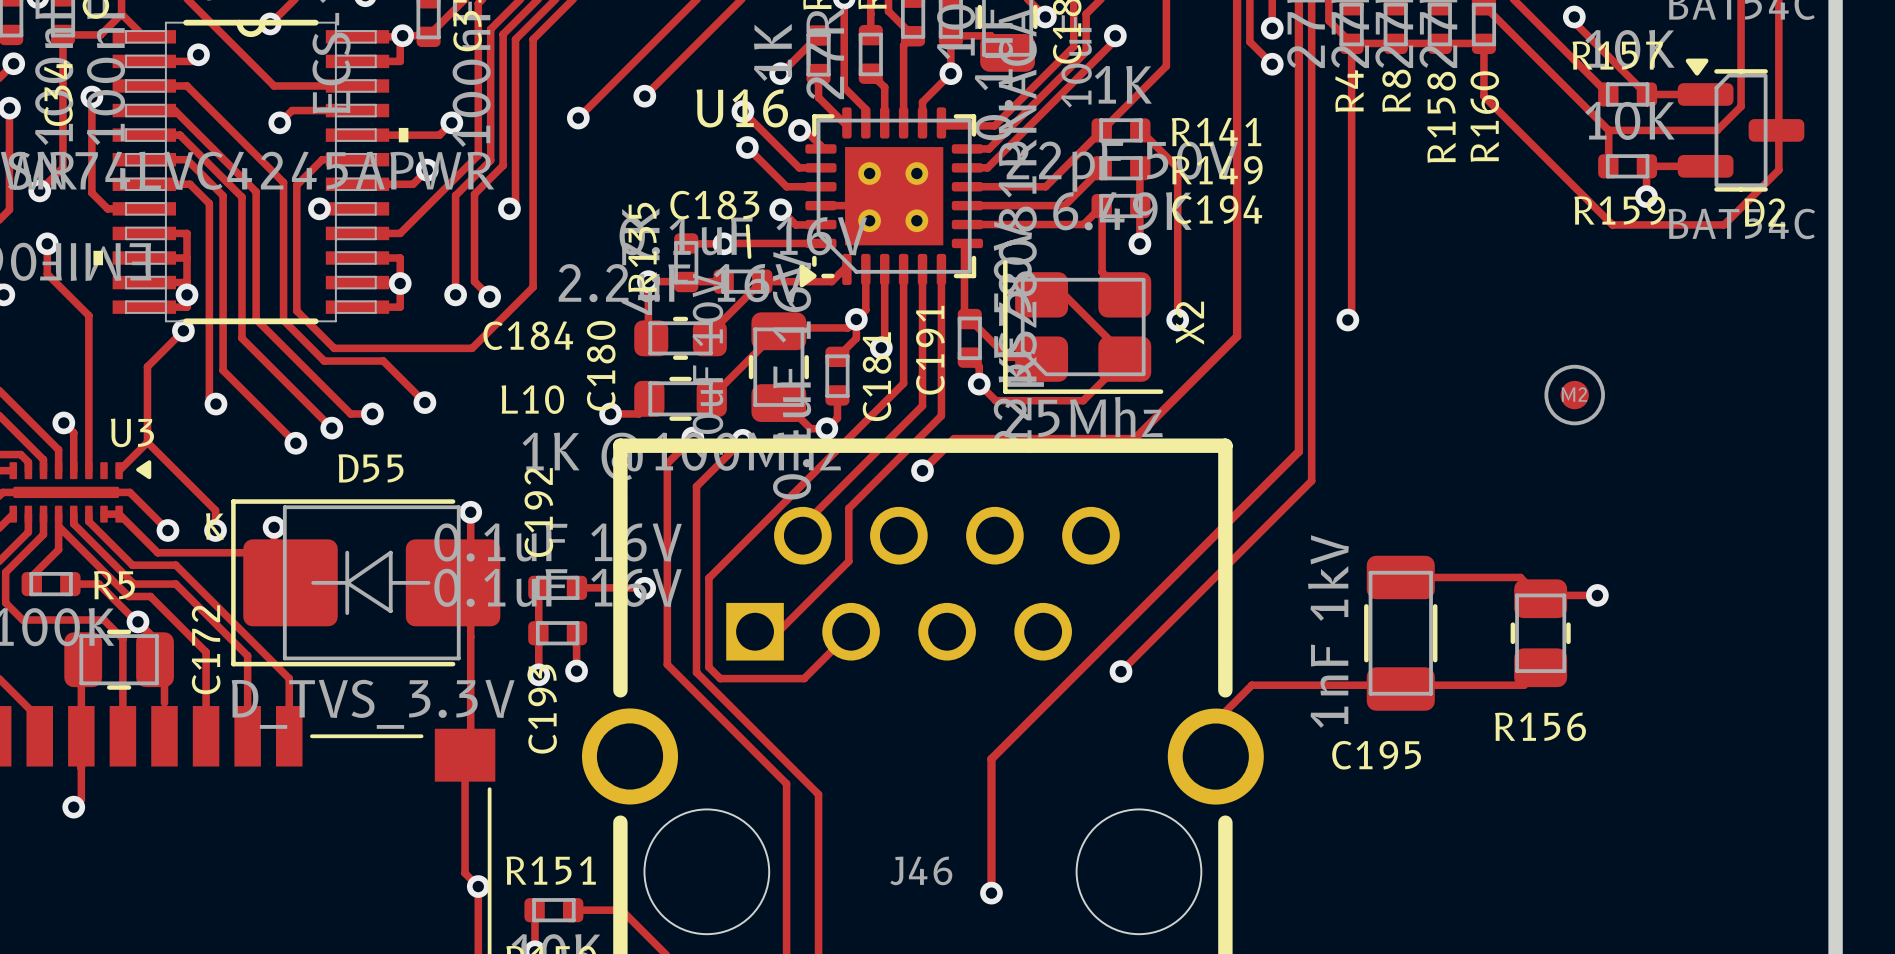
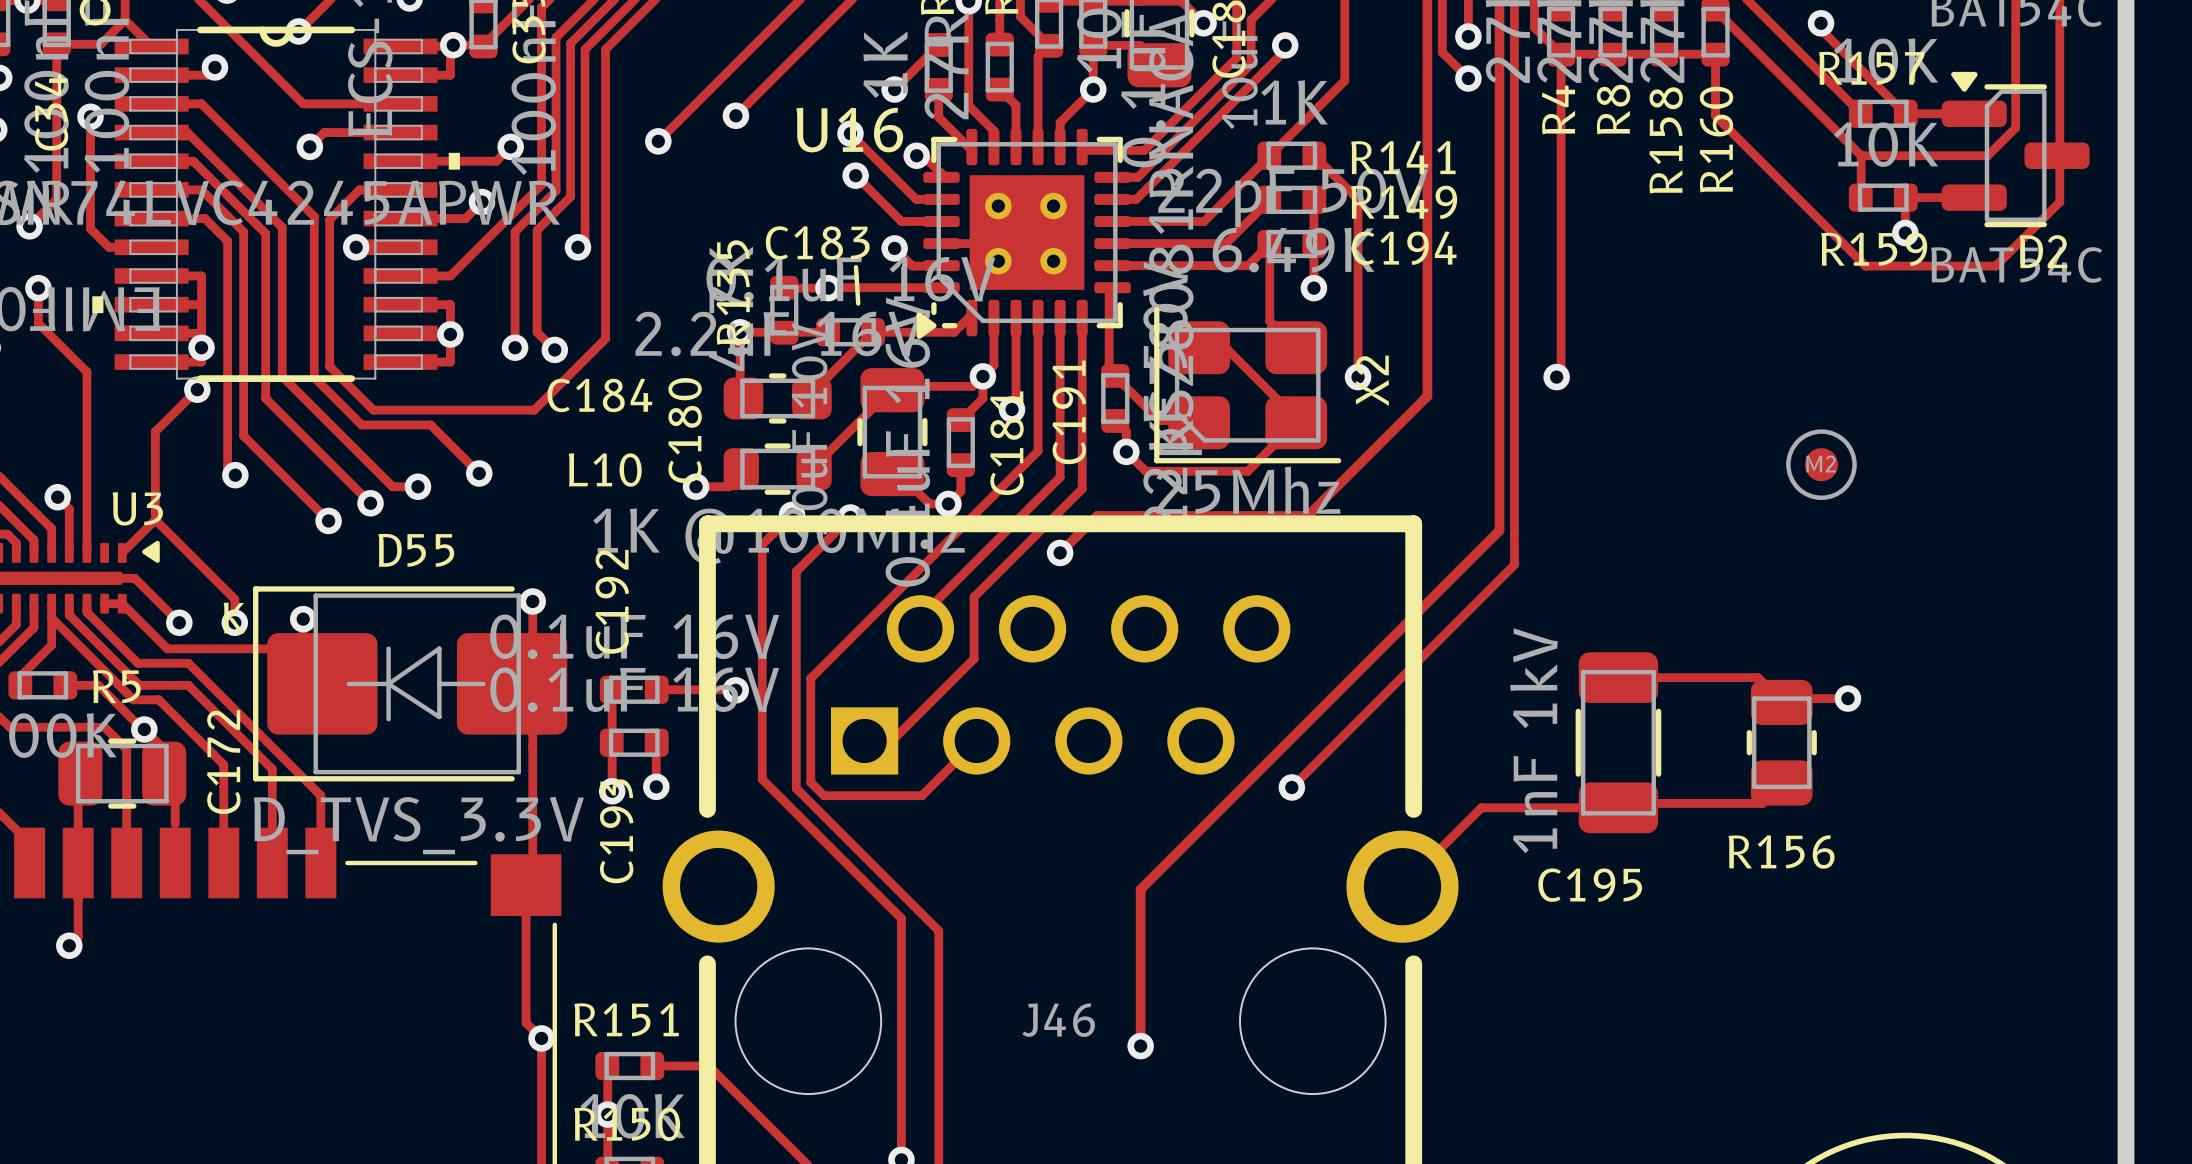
track: (1400, 685) (1251, 685) (1215, 721) -> none
track: none -> (1618, 807) (1481, 807) (1402, 886)

